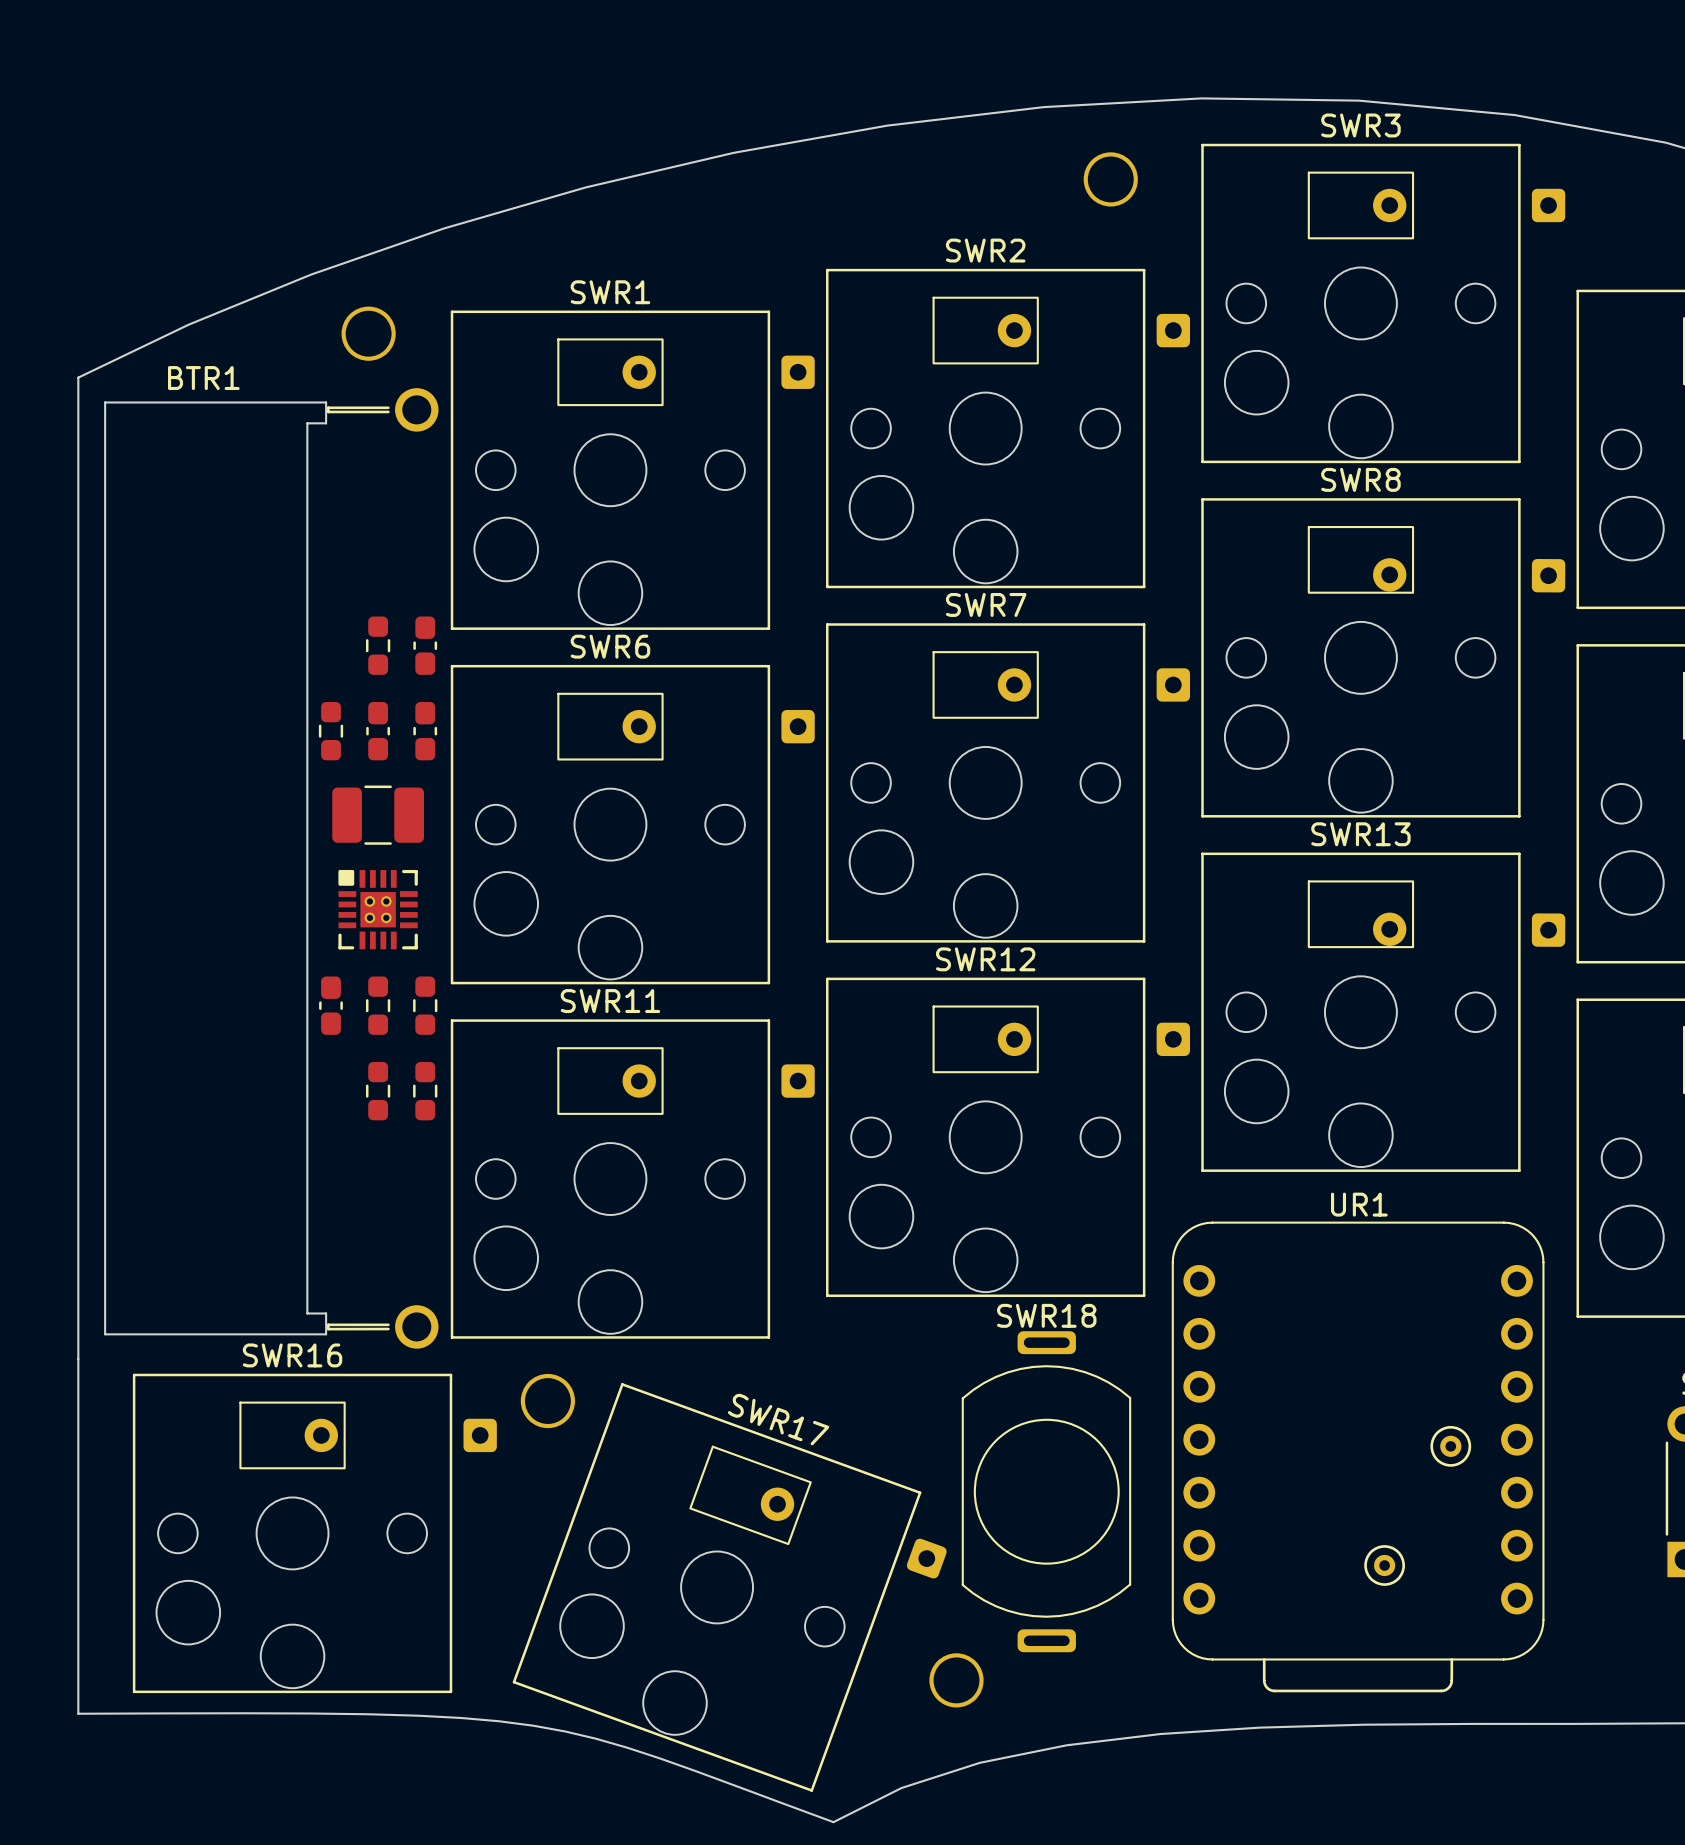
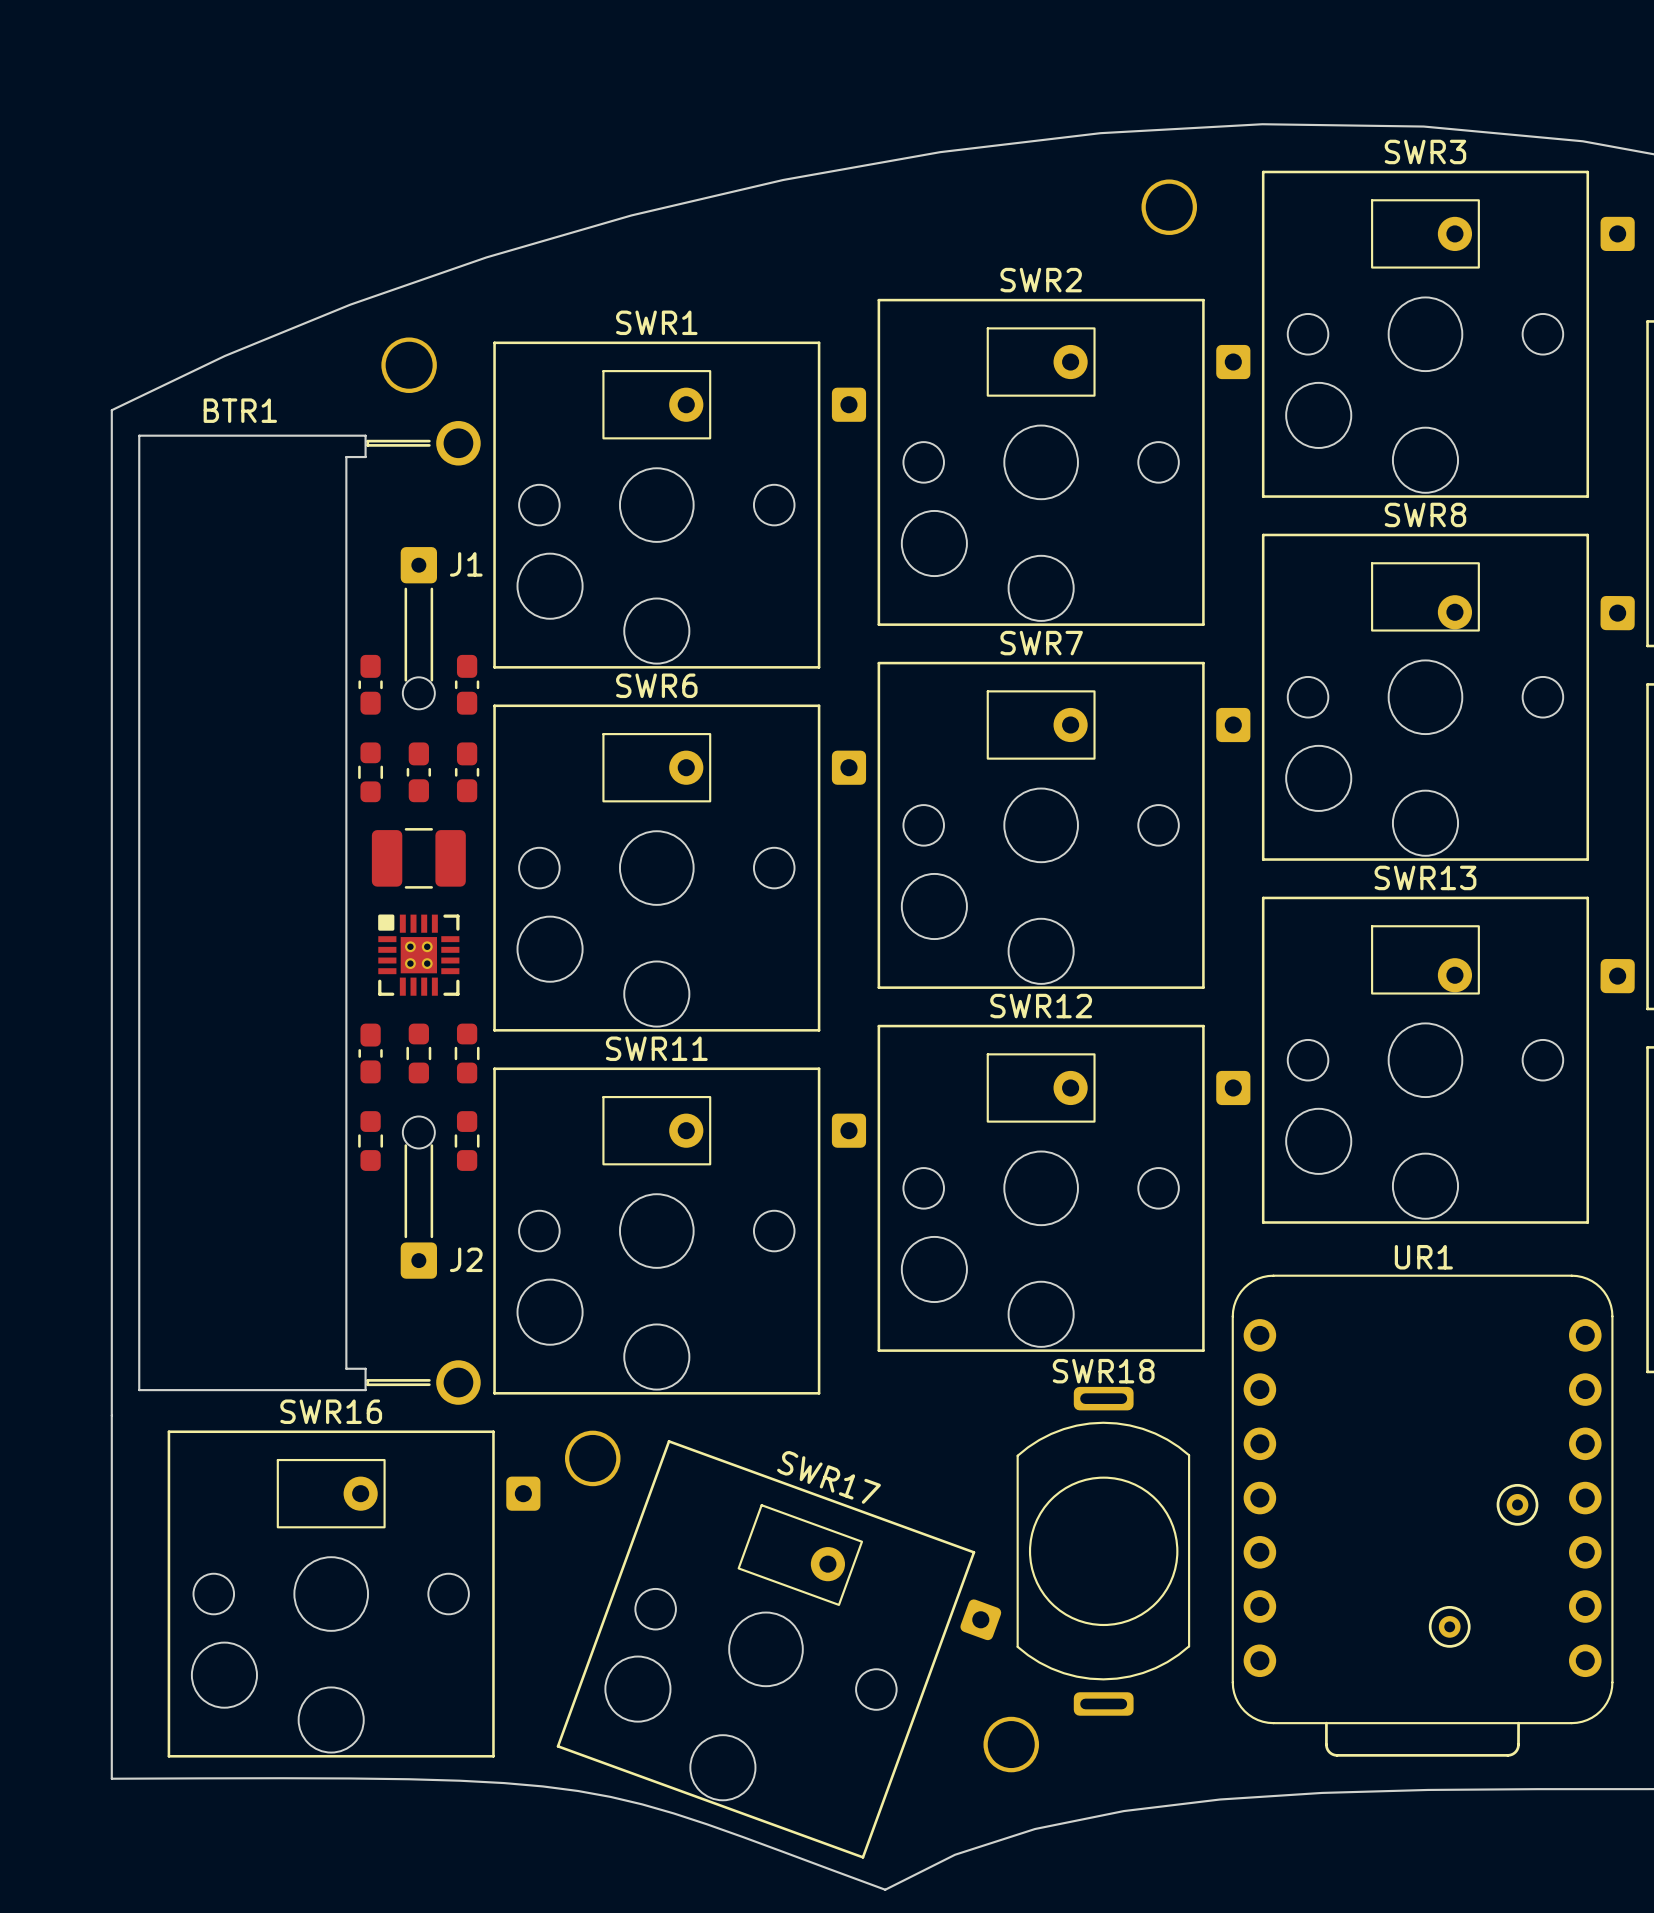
J1: none -> (418, 628)
part: none -> (370, 684)
part: (378, 645) -> none
part position: (378, 1091) -> (370, 1141)
J2: none -> (418, 1197)

